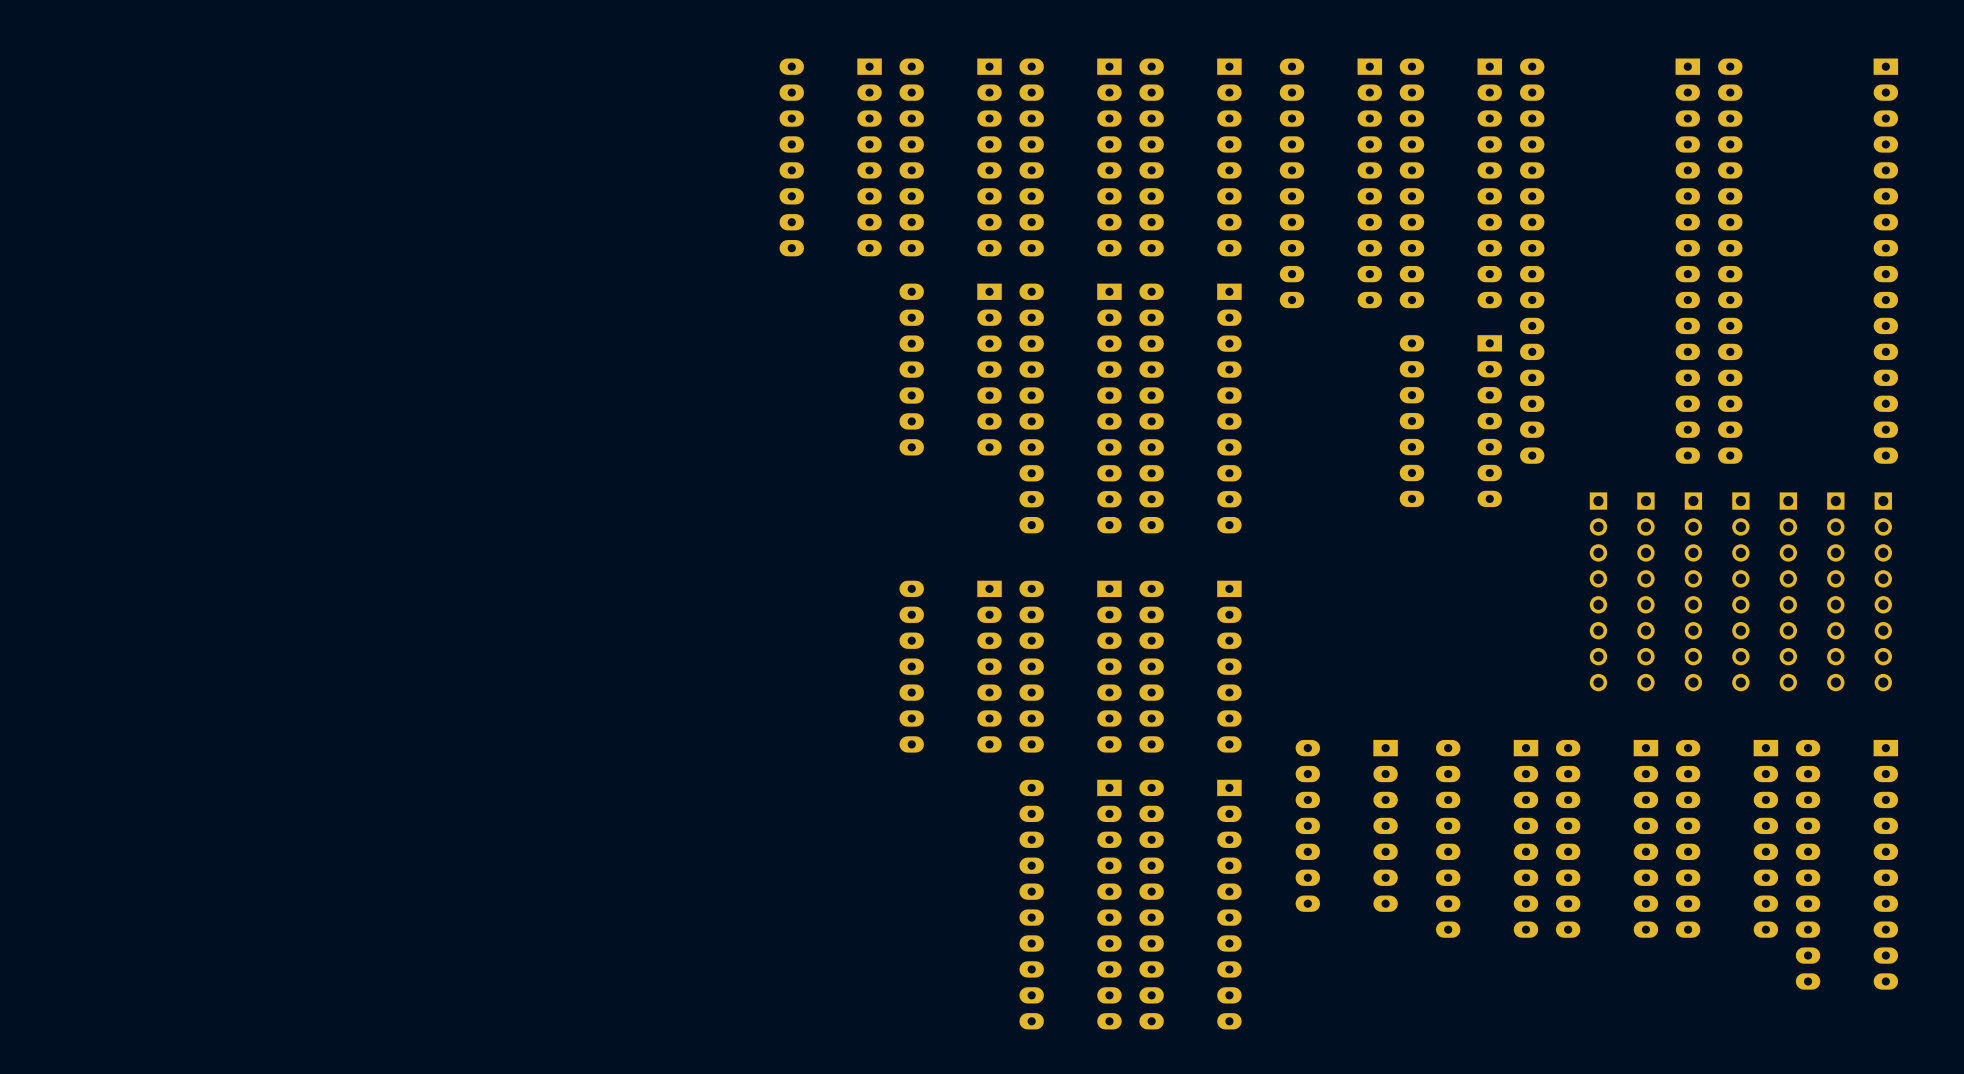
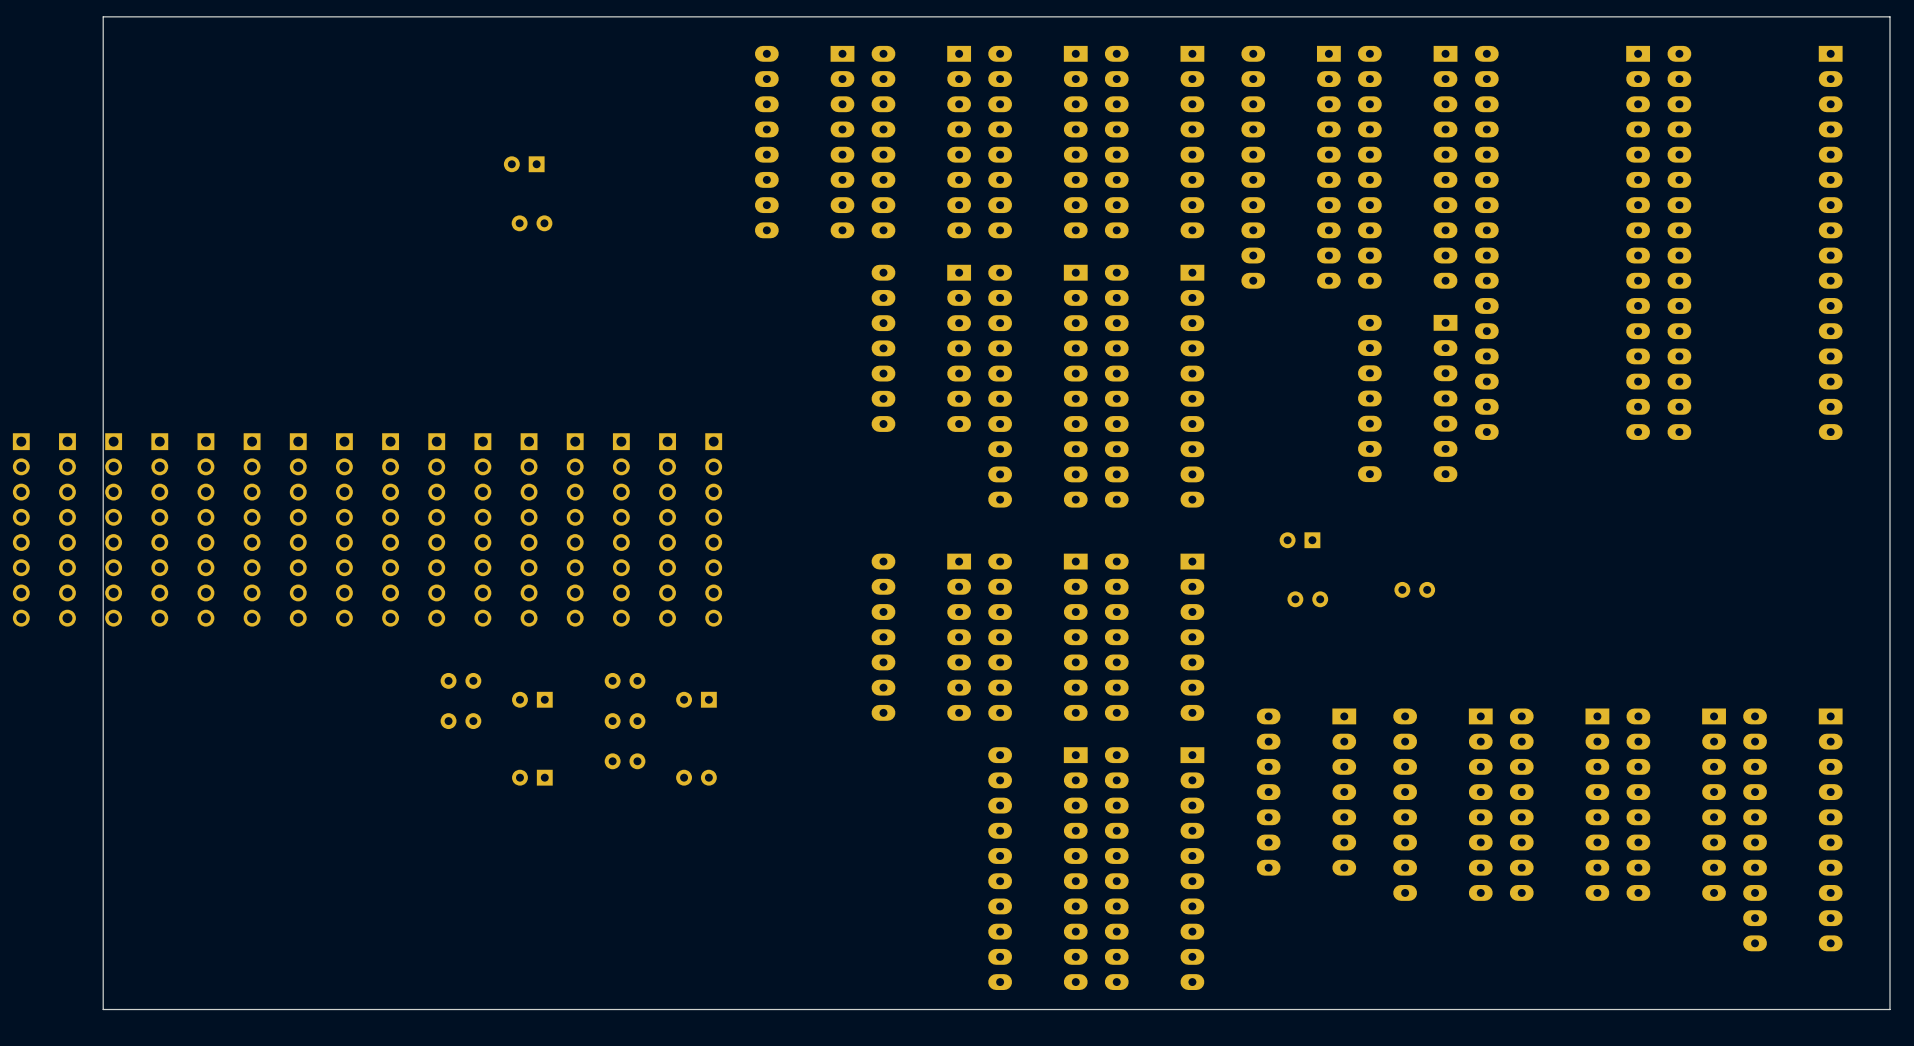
board edge: none -> (1890, 16) (103, 16) (103, 1009) (1890, 1009) (1890, 16)
part: none -> (524, 164)
part: none -> (532, 223)
part: none -> (21, 529)
part: none -> (67, 529)
part: none -> (113, 529)
part: none -> (159, 529)
part: none -> (205, 529)
part: none -> (252, 529)
part: none -> (298, 529)
part: none -> (344, 529)
part: none -> (390, 529)
part: none -> (436, 529)
part: none -> (482, 529)
part: none -> (529, 529)
part: none -> (575, 529)
part: none -> (621, 529)
part: none -> (667, 529)
part: none -> (713, 529)
part: none -> (1300, 540)
part: (1598, 591) -> none
part: (1645, 591) -> none
part: (1693, 591) -> none
part: (1740, 591) -> none
part: (1788, 591) -> none
part: (1835, 591) -> none
part: (1883, 591) -> none
part: none -> (1414, 589)
part: none -> (1307, 599)
part: none -> (460, 680)
part: none -> (625, 680)
part: none -> (532, 699)
part: none -> (696, 699)
part: none -> (460, 721)
part: none -> (625, 721)
part: none -> (625, 761)
part: none -> (532, 777)
part: none -> (696, 777)

